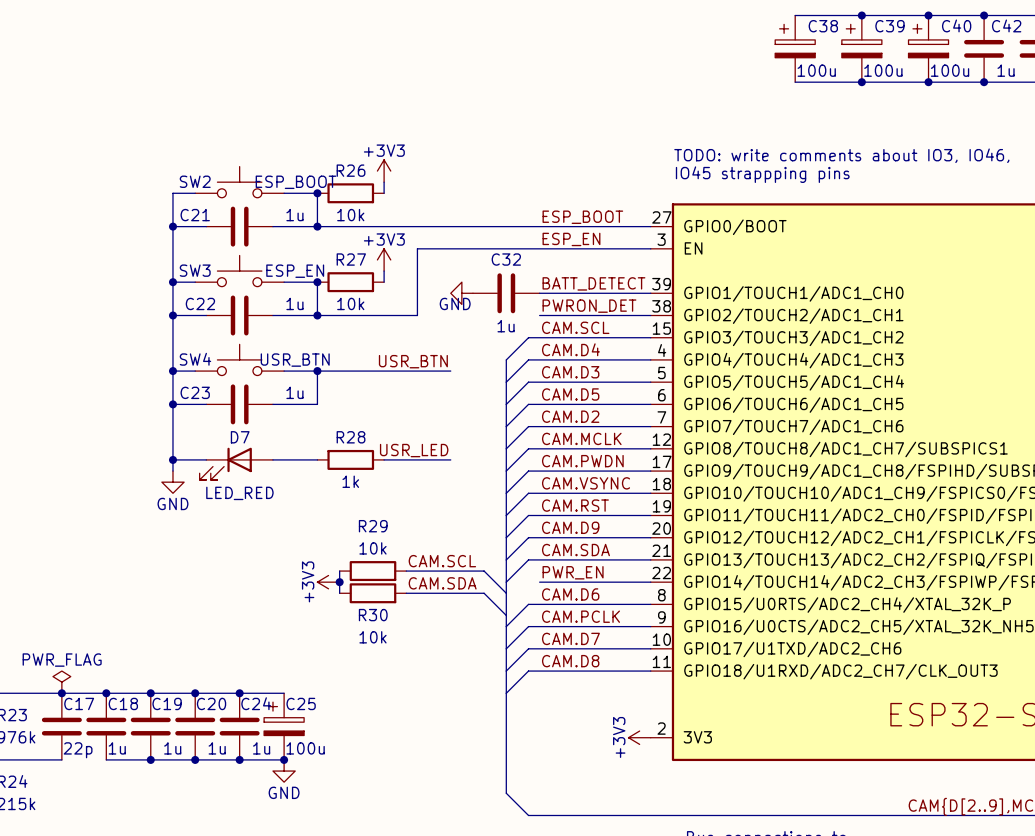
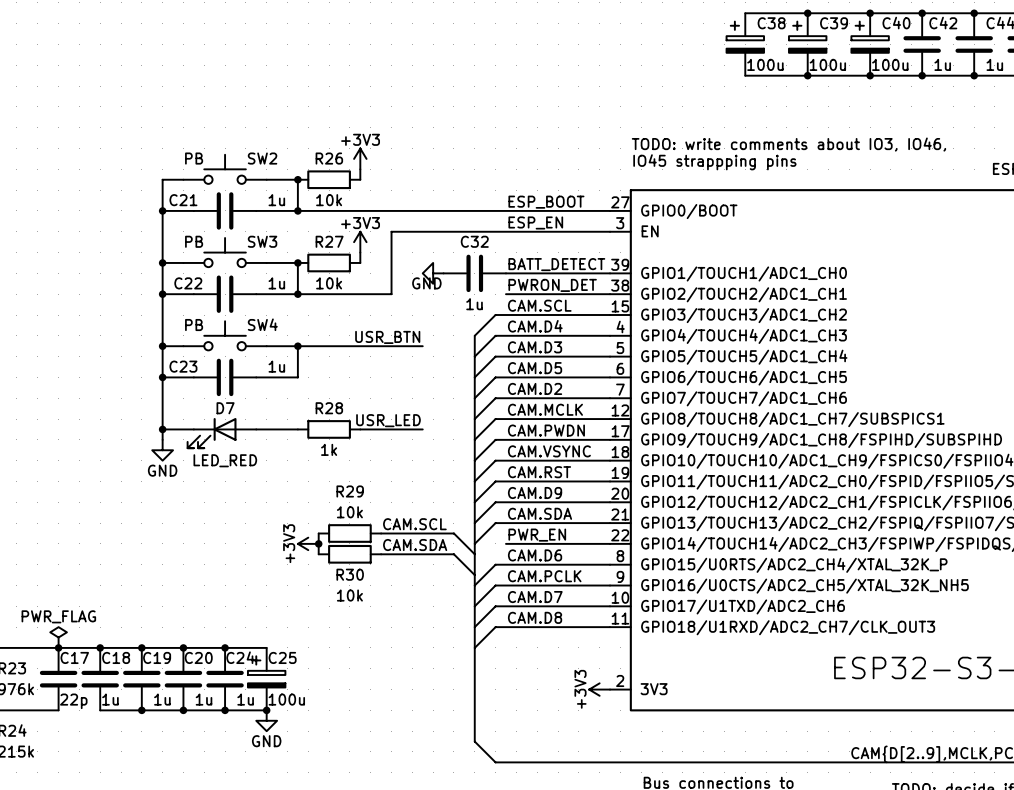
SW2 name position: SW2 (195, 181) -> SW2 (262, 158)
SW2 text: ESP_BOOT (296, 182) -> PB (194, 158)
SW3 name position: SW3 (195, 270) -> SW3 (262, 241)
SW3 text: ESP_EN (295, 271) -> PB (194, 241)
SW4 name position: SW4 (195, 359) -> SW4 (262, 324)
SW4 text: USR_BTN (295, 360) -> PB (194, 325)

